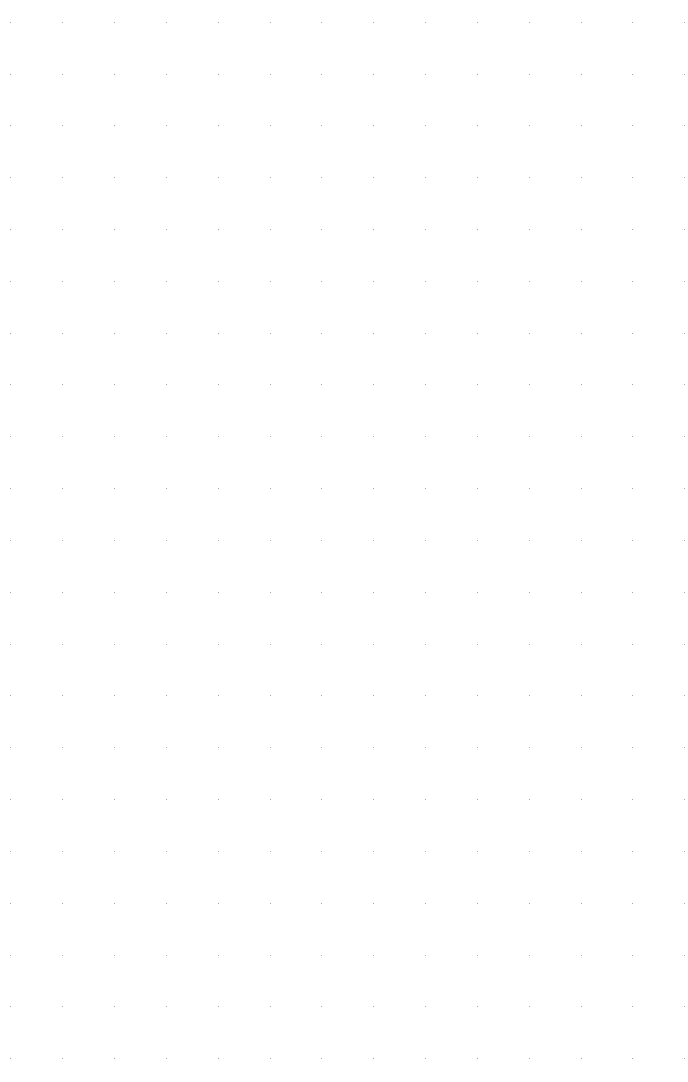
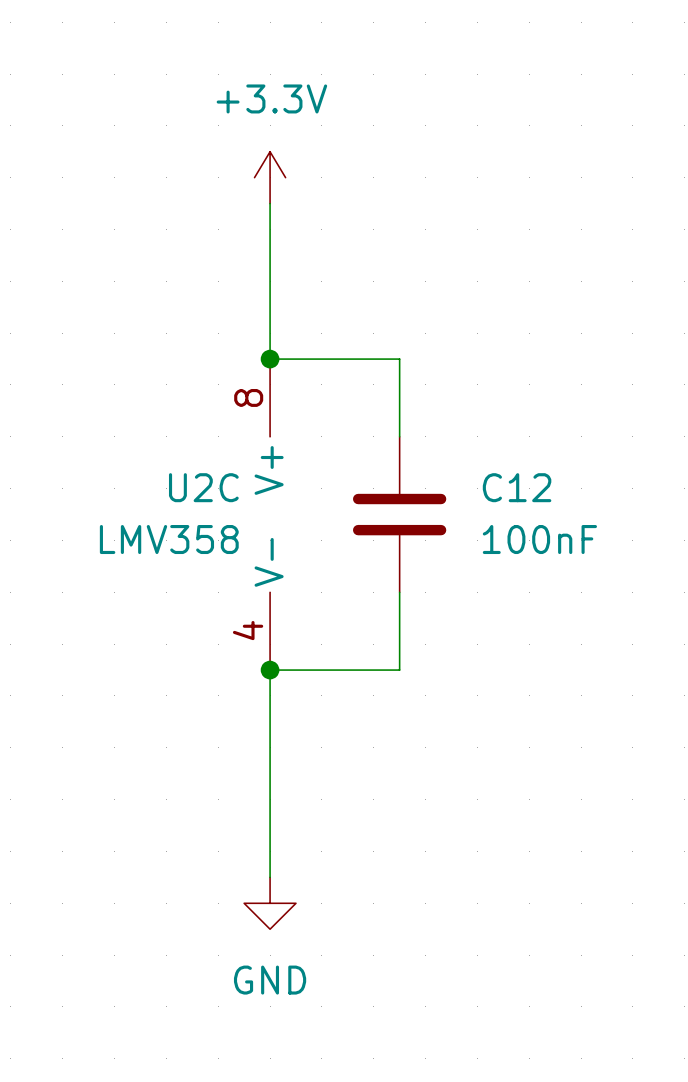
power symbol: none -> +3.3V (270, 177)
wire: none -> (270, 203) (270, 359) (399, 359) (399, 436)
junction: none -> (270, 359)
U2C: none -> LMV358 (270, 514)
C12: none -> 100nF (399, 514)
wire: none -> (399, 592) (399, 670) (270, 670) (270, 877)
junction: none -> (270, 670)
power symbol: none -> GND (270, 903)

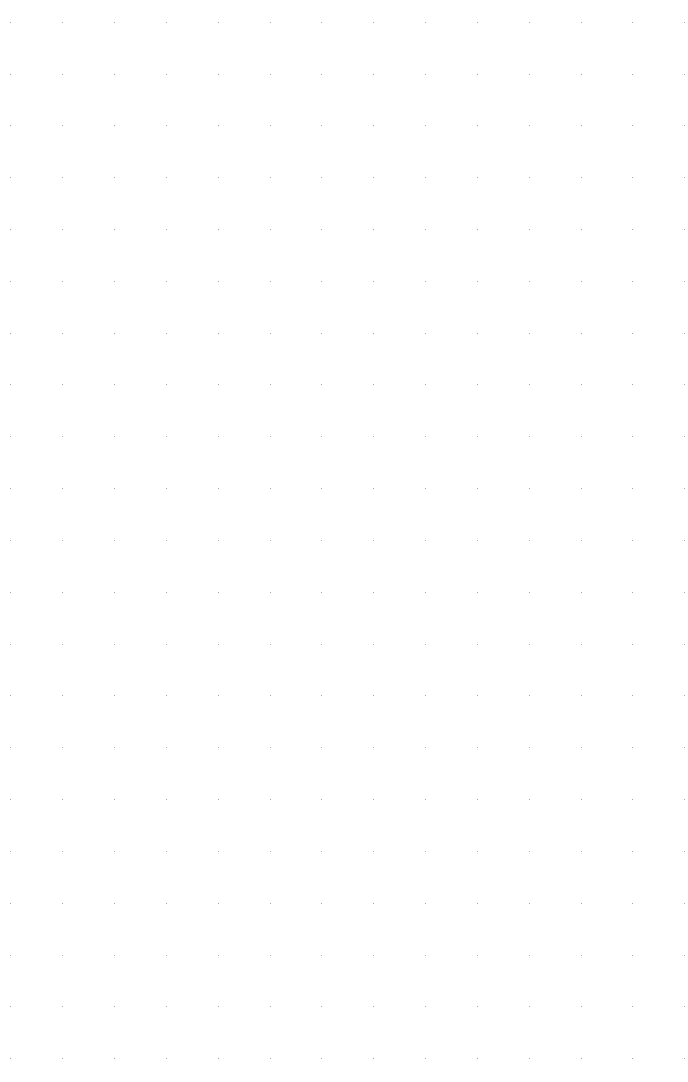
power symbol: +3.3V (270, 177) -> none
wire: (270, 203) (270, 359) (399, 359) (399, 436) -> none
junction: (270, 359) -> none
U2C: LMV358 (270, 514) -> none
C12: 100nF (399, 514) -> none
wire: (399, 592) (399, 670) (270, 670) (270, 877) -> none
junction: (270, 670) -> none
power symbol: GND (270, 903) -> none

